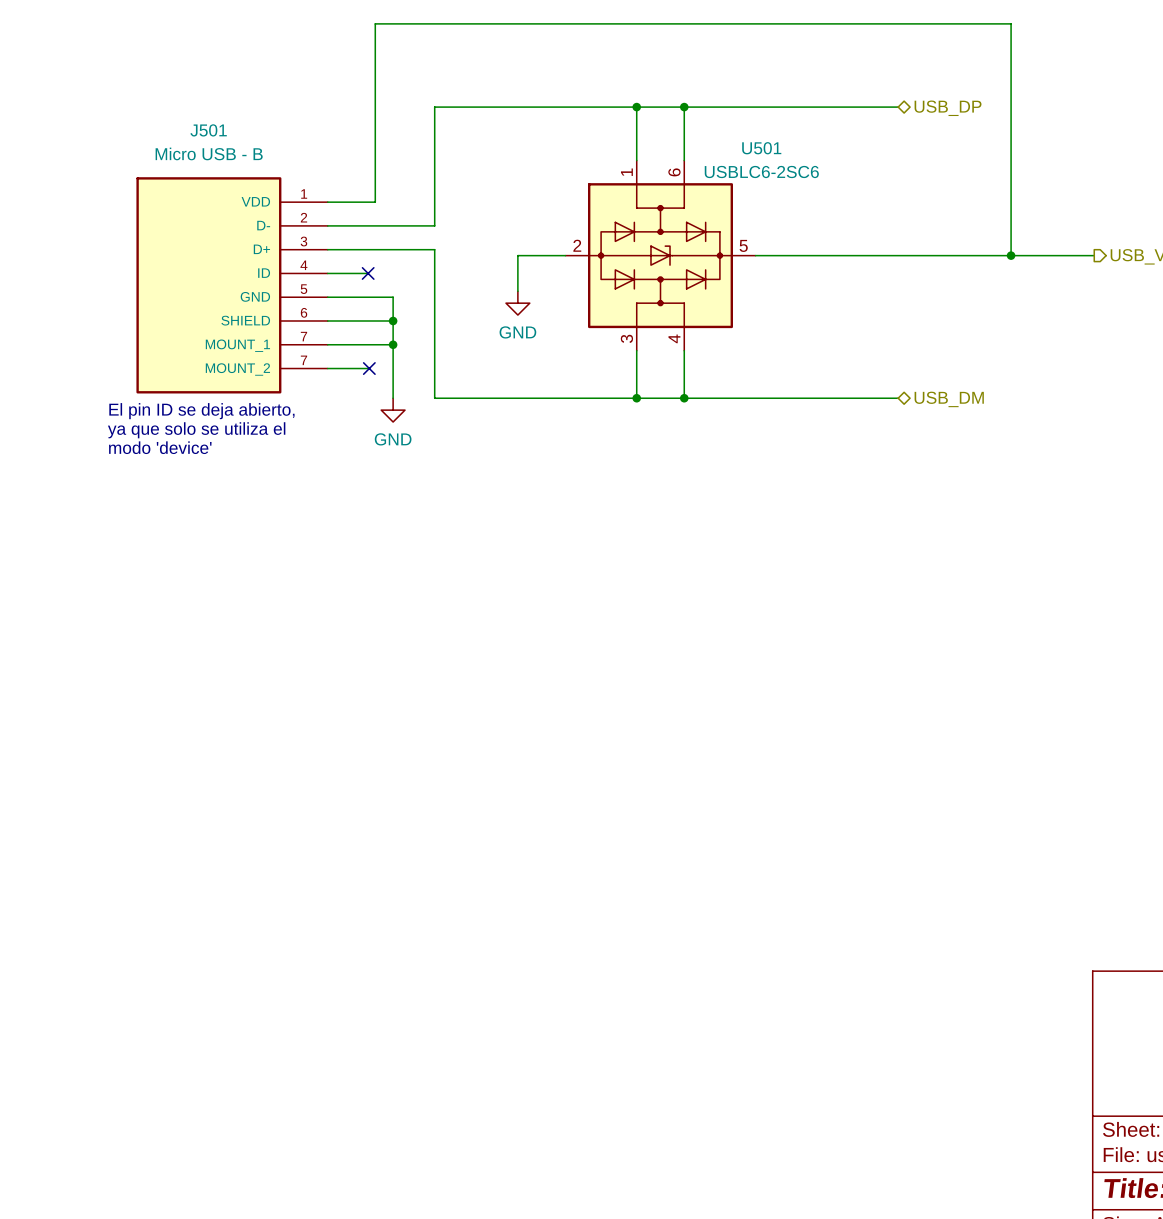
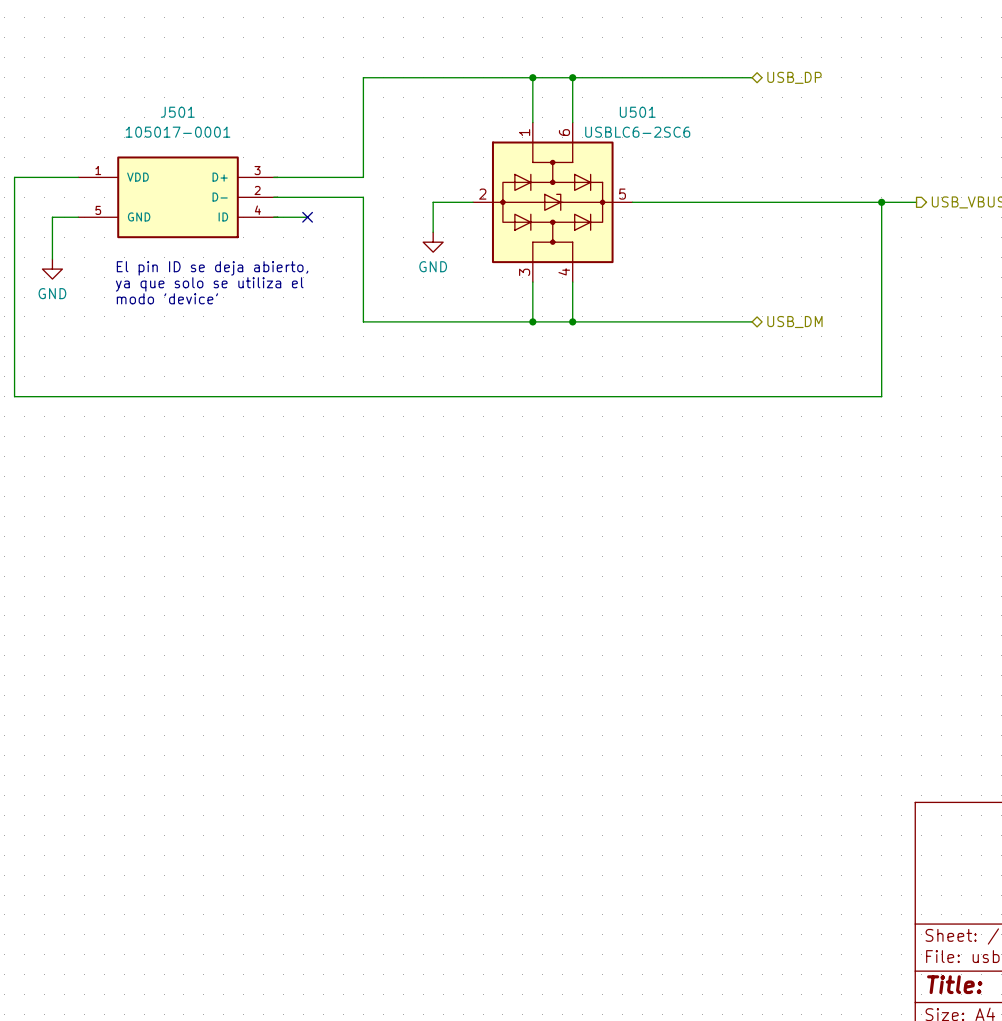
J501 name position: J501 (208, 130) -> J501 (177, 112)
J501 value: Micro USB - B (209, 153) -> 105017-0001 (178, 132)
J501 symbol: [136, 177, 328, 394] -> [78, 156, 278, 239]
wire: (327, 202) (375, 202) (375, 23) (1011, 23) (1011, 255) -> none
wire: none -> (78, 177) (14, 177) (14, 396) (881, 396) (881, 202)
junction position: (1011, 255) -> (881, 202)
wire: none -> (78, 217) (52, 217) (52, 259)
wire: (327, 297) (393, 297) (393, 398) -> none
wire: (327, 320) (393, 320) -> none
junction: (393, 320) -> none
power symbol: none -> GND (52, 269)
wire: (327, 344) (393, 344) -> none
junction: (393, 344) -> none
wire: (327, 368) (369, 368) -> none
no-connect mark: (369, 368) -> none
power symbol: GND (393, 410) -> none
text position: El pin ID se deja abierto, (201, 411) -> El pin ID se deja abierto, (212, 268)
text position: ya que solo se utiliza el (196, 430) -> ya que solo se utiliza el (209, 284)
text position: modo 'device' (160, 447) -> modo 'device' (167, 298)

